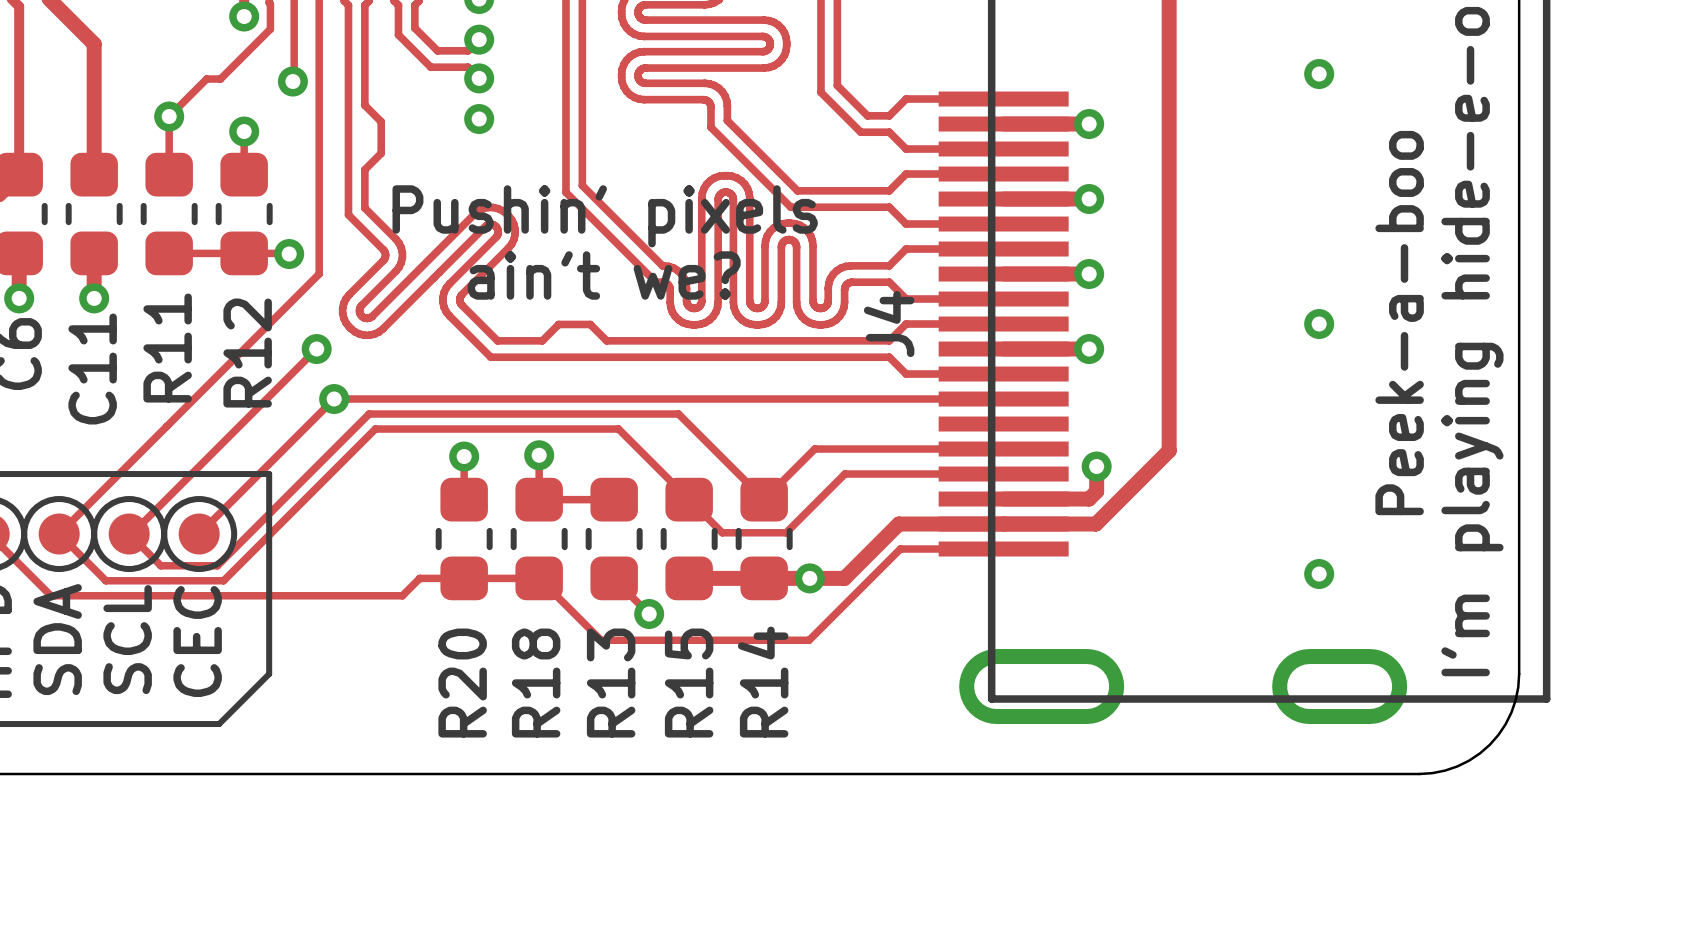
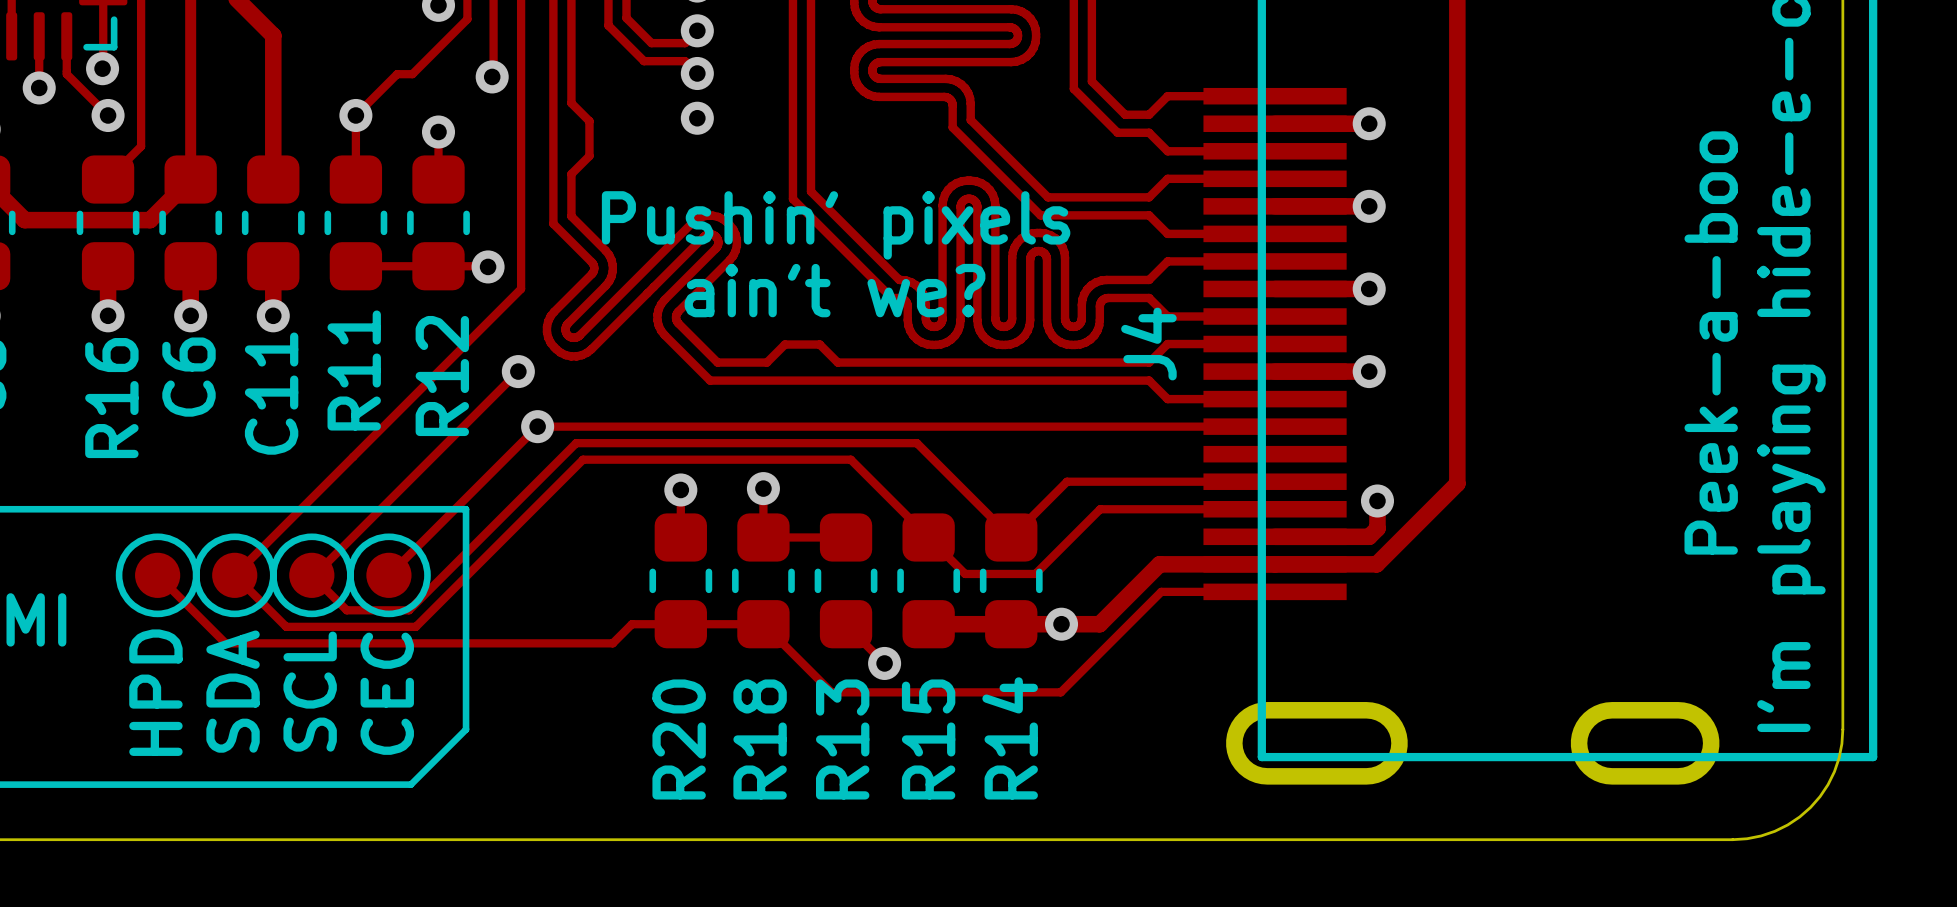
via: (1319, 74) -> none
via: (1319, 324) -> none
via: (1319, 574) -> none

